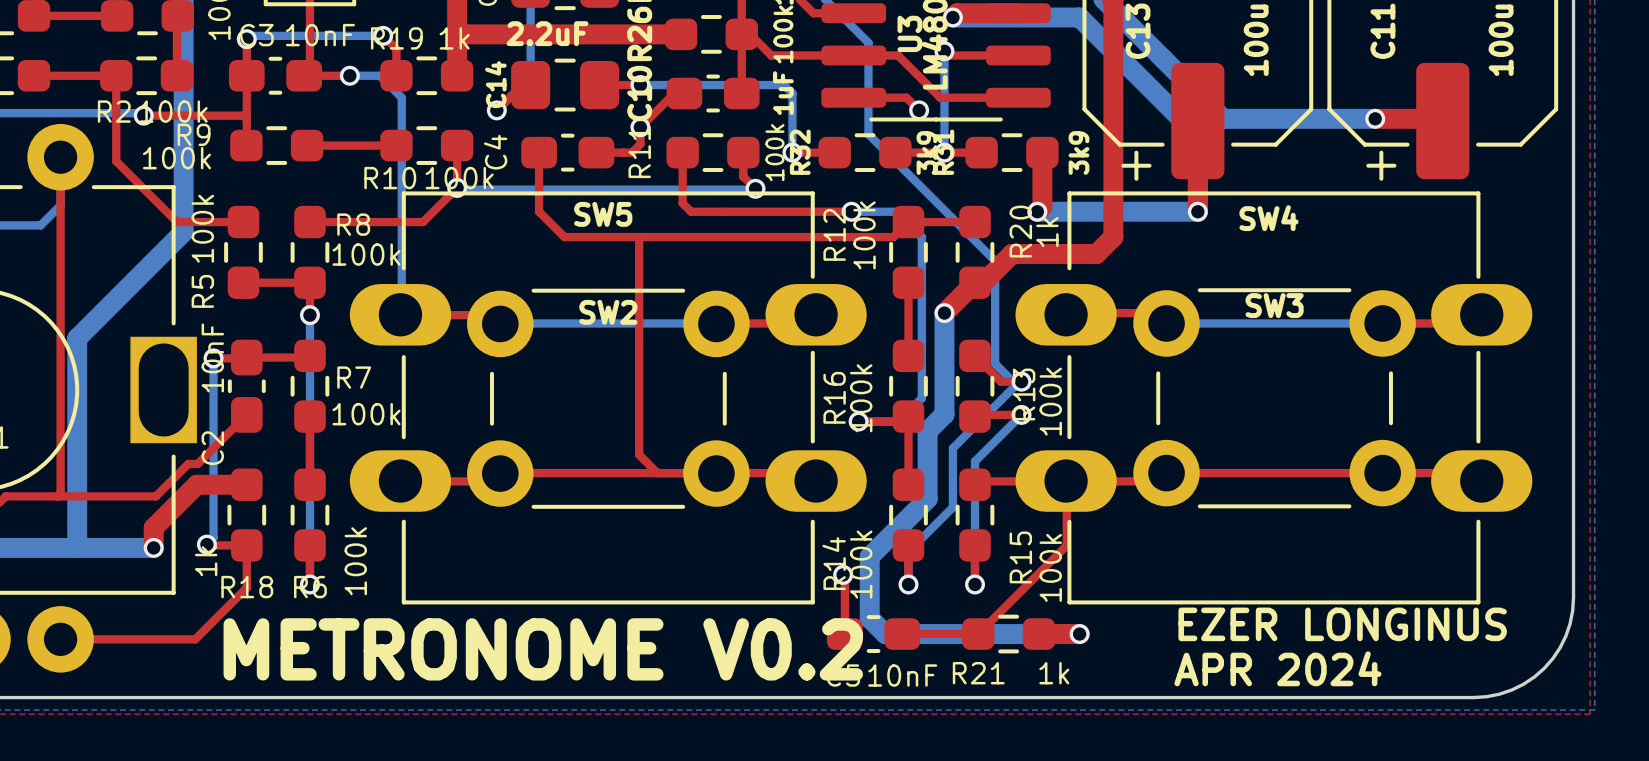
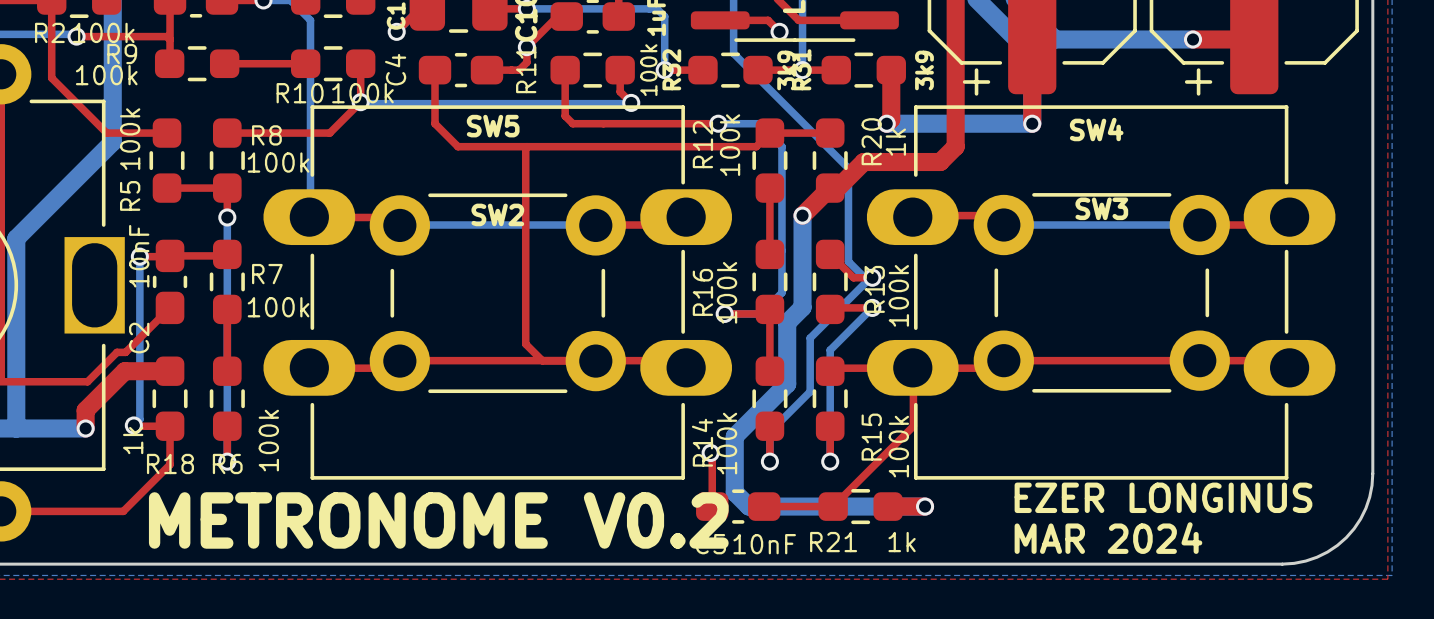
text: APR 2024 (1277, 668) -> MAR 2024 (1108, 538)

